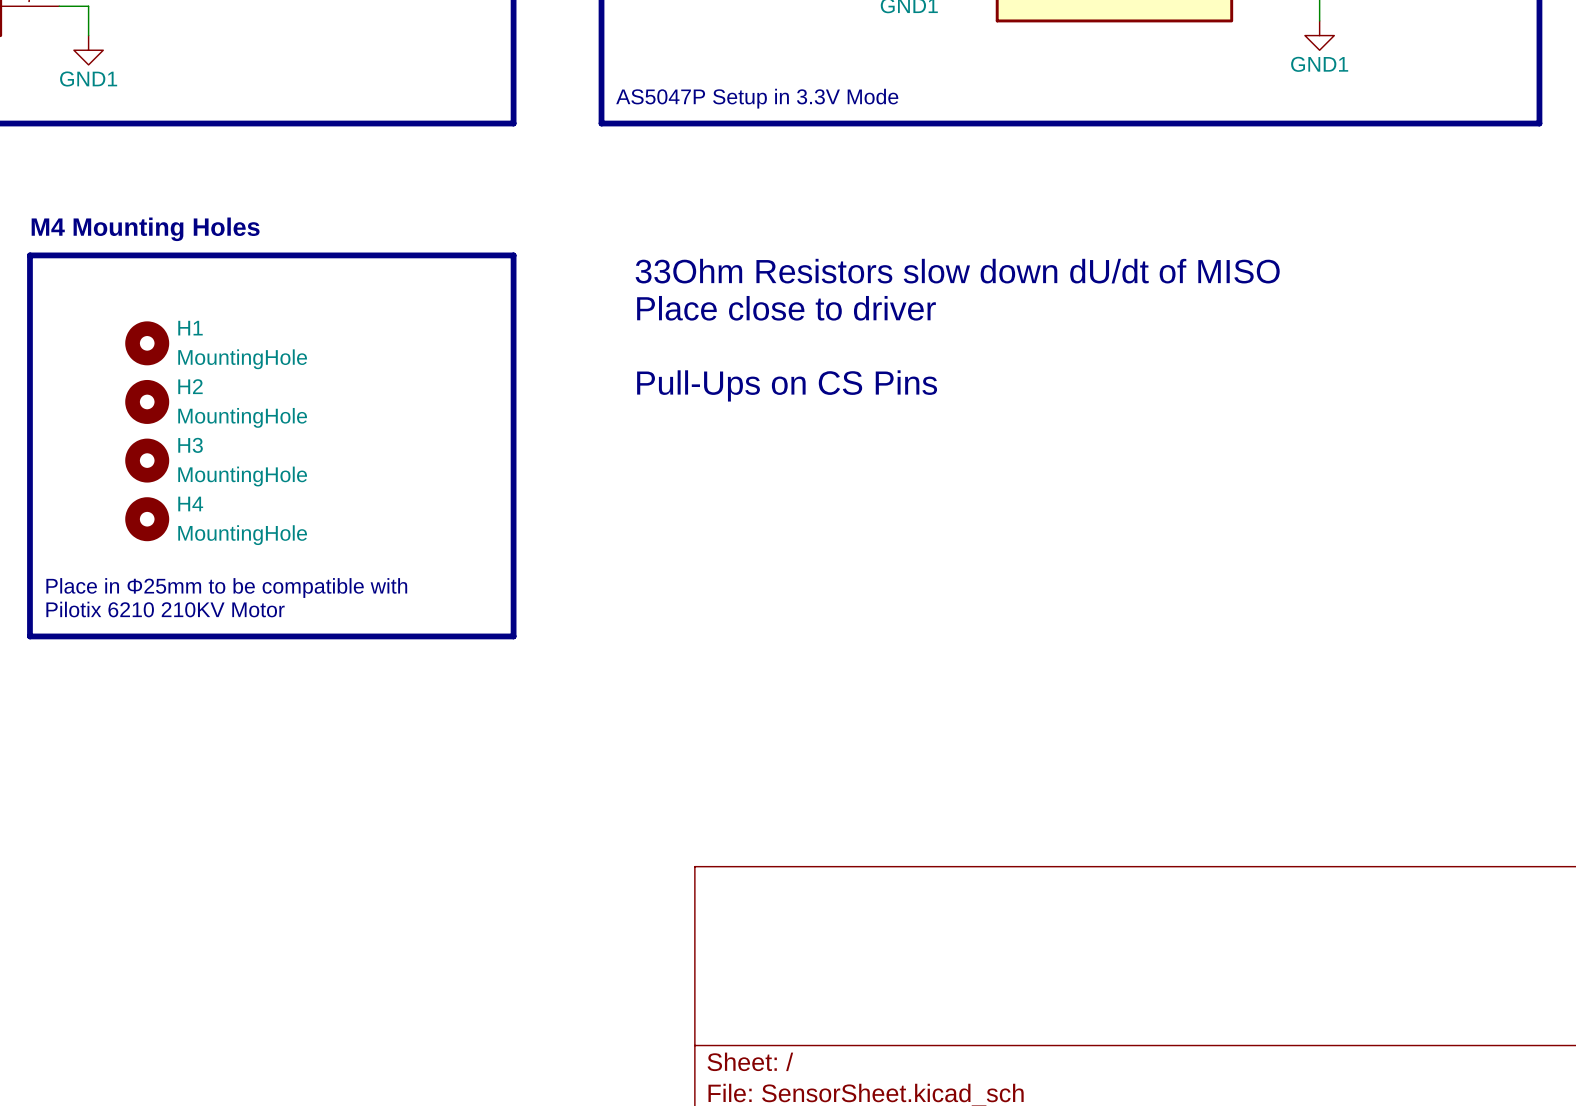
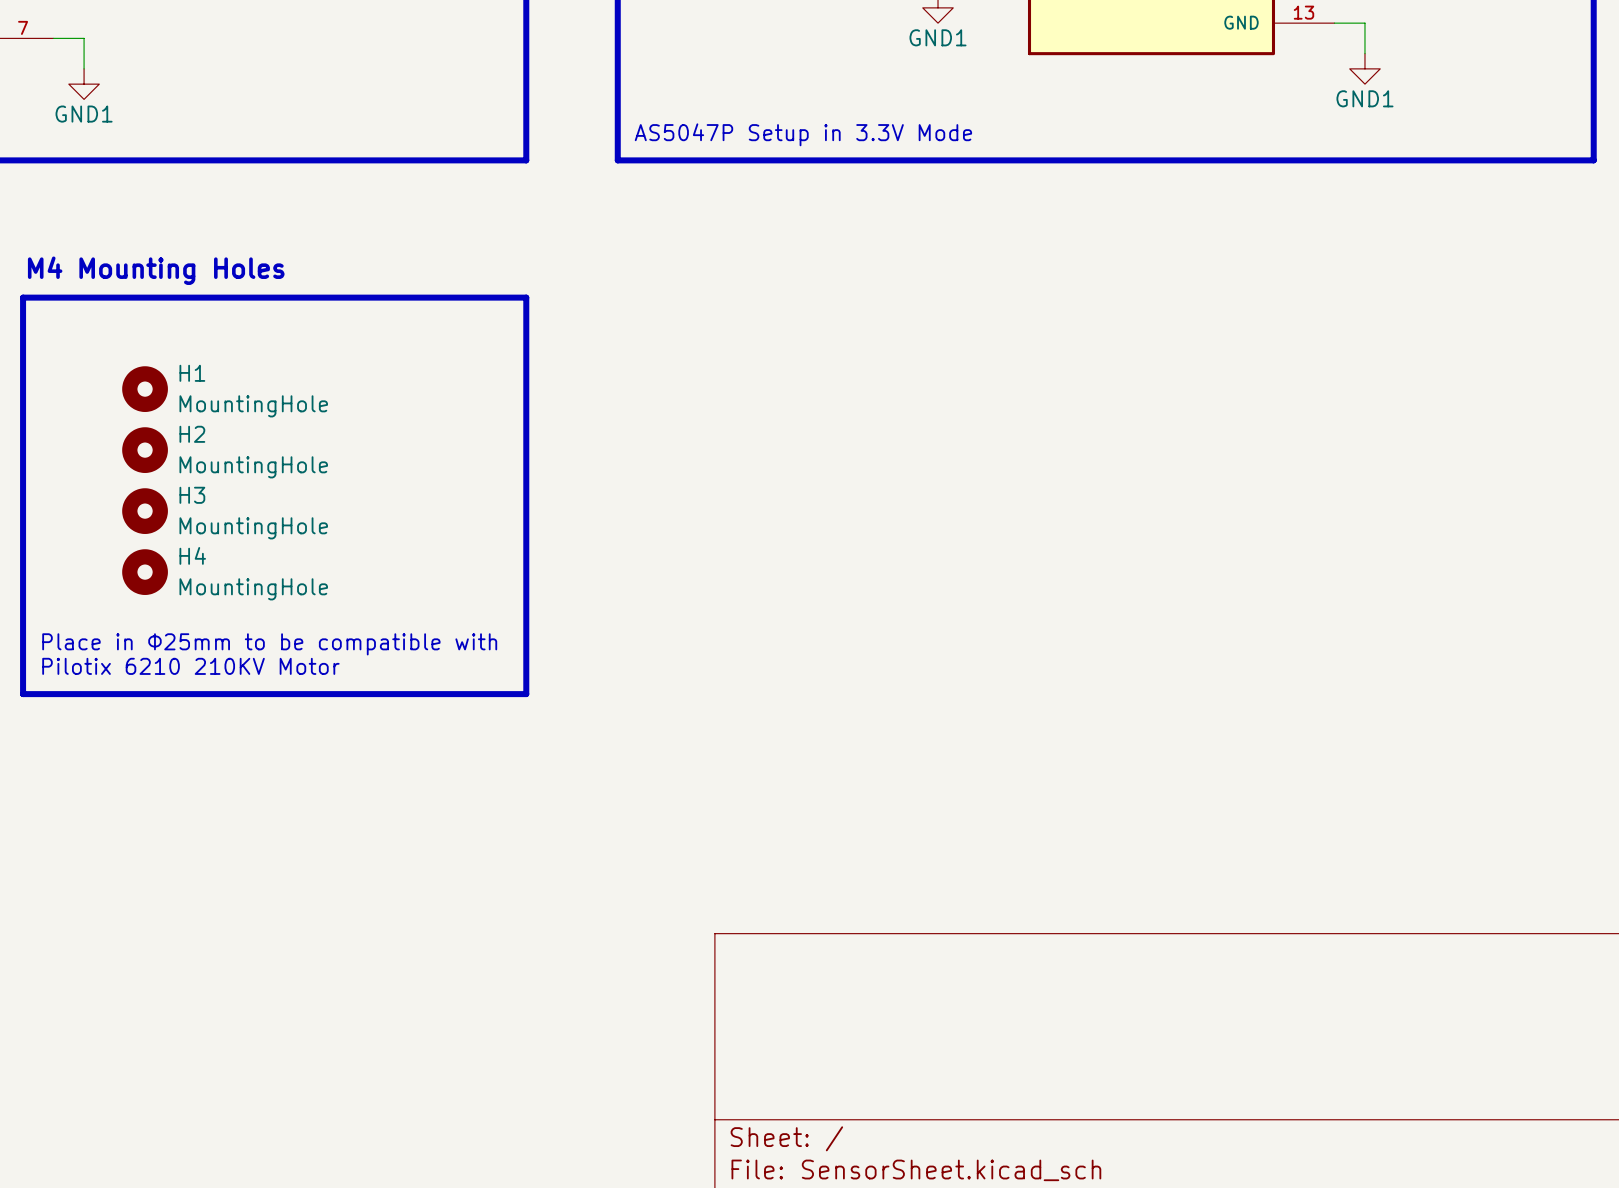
text: 33Ohm Resistors slow down dU/dt of MISO (957, 271) -> none
text: Place close to driver (786, 308) -> none
text: Pull-Ups on CS Pins (787, 385) -> none

